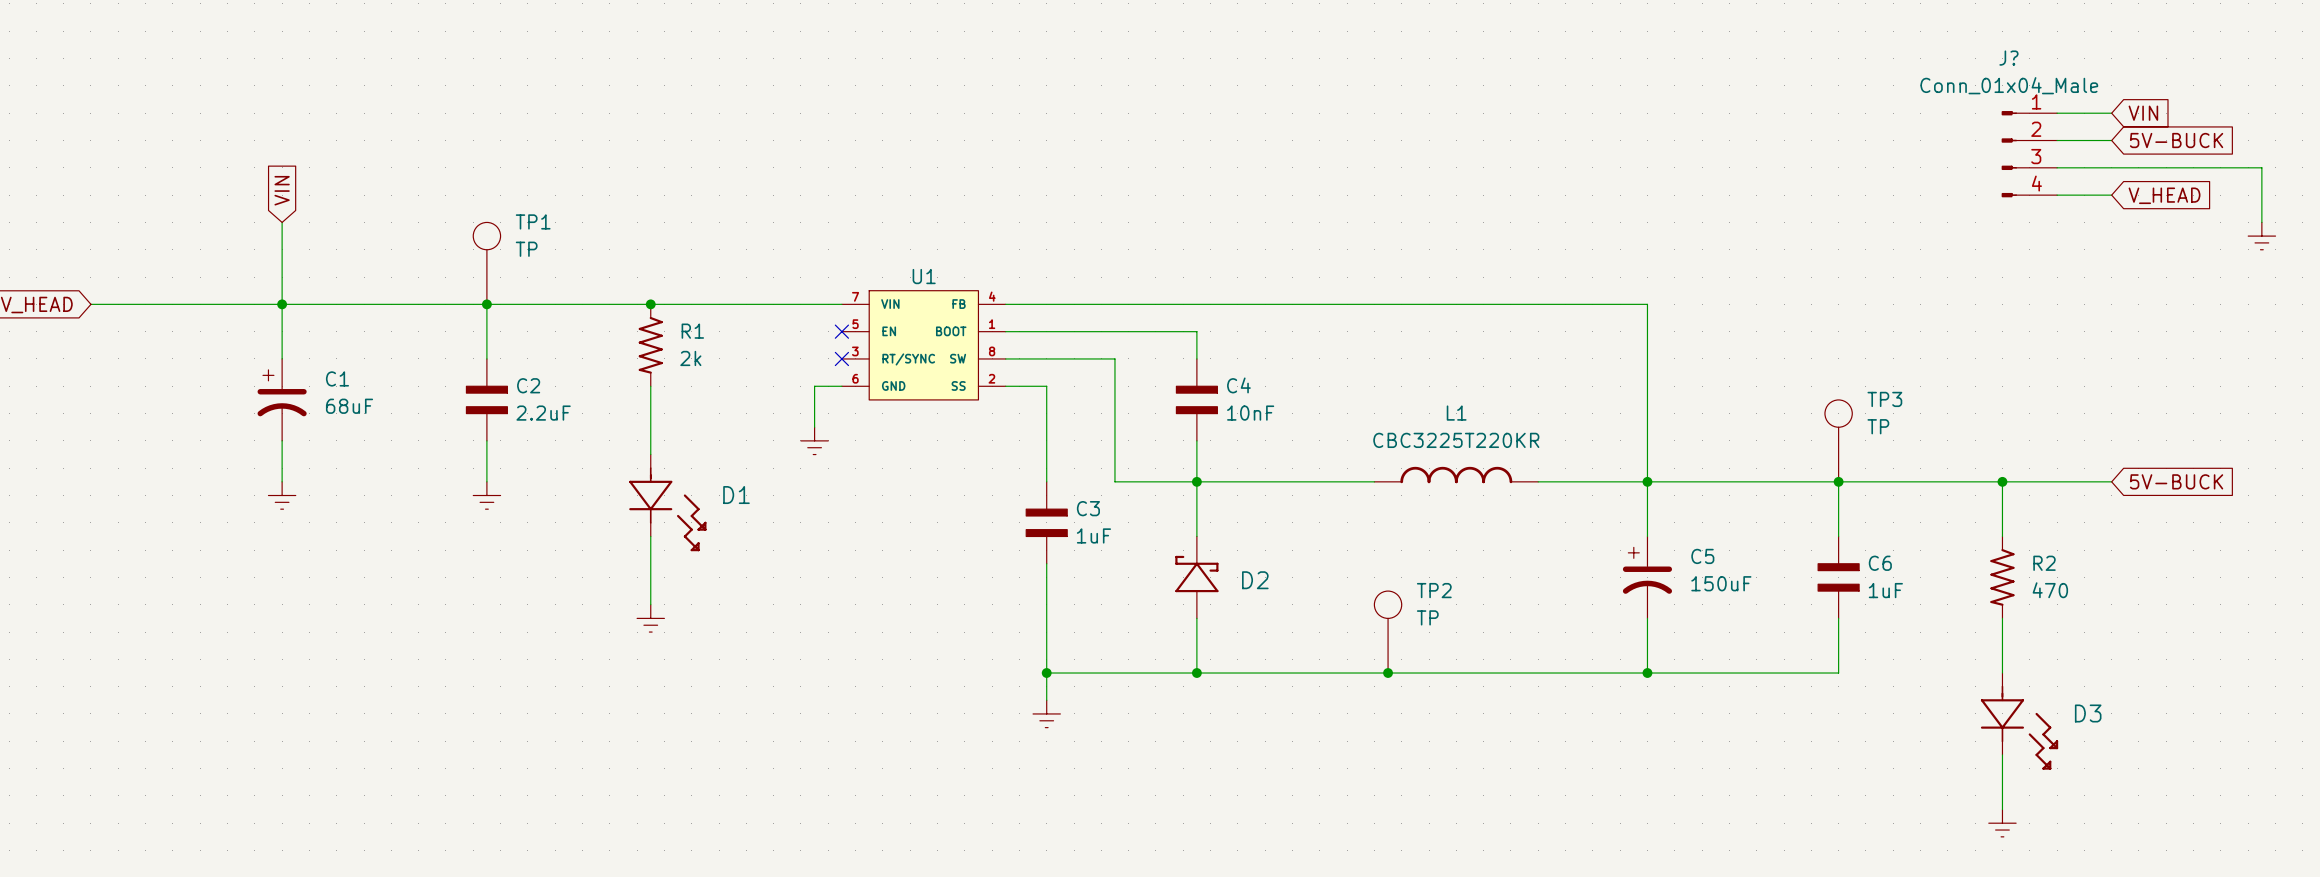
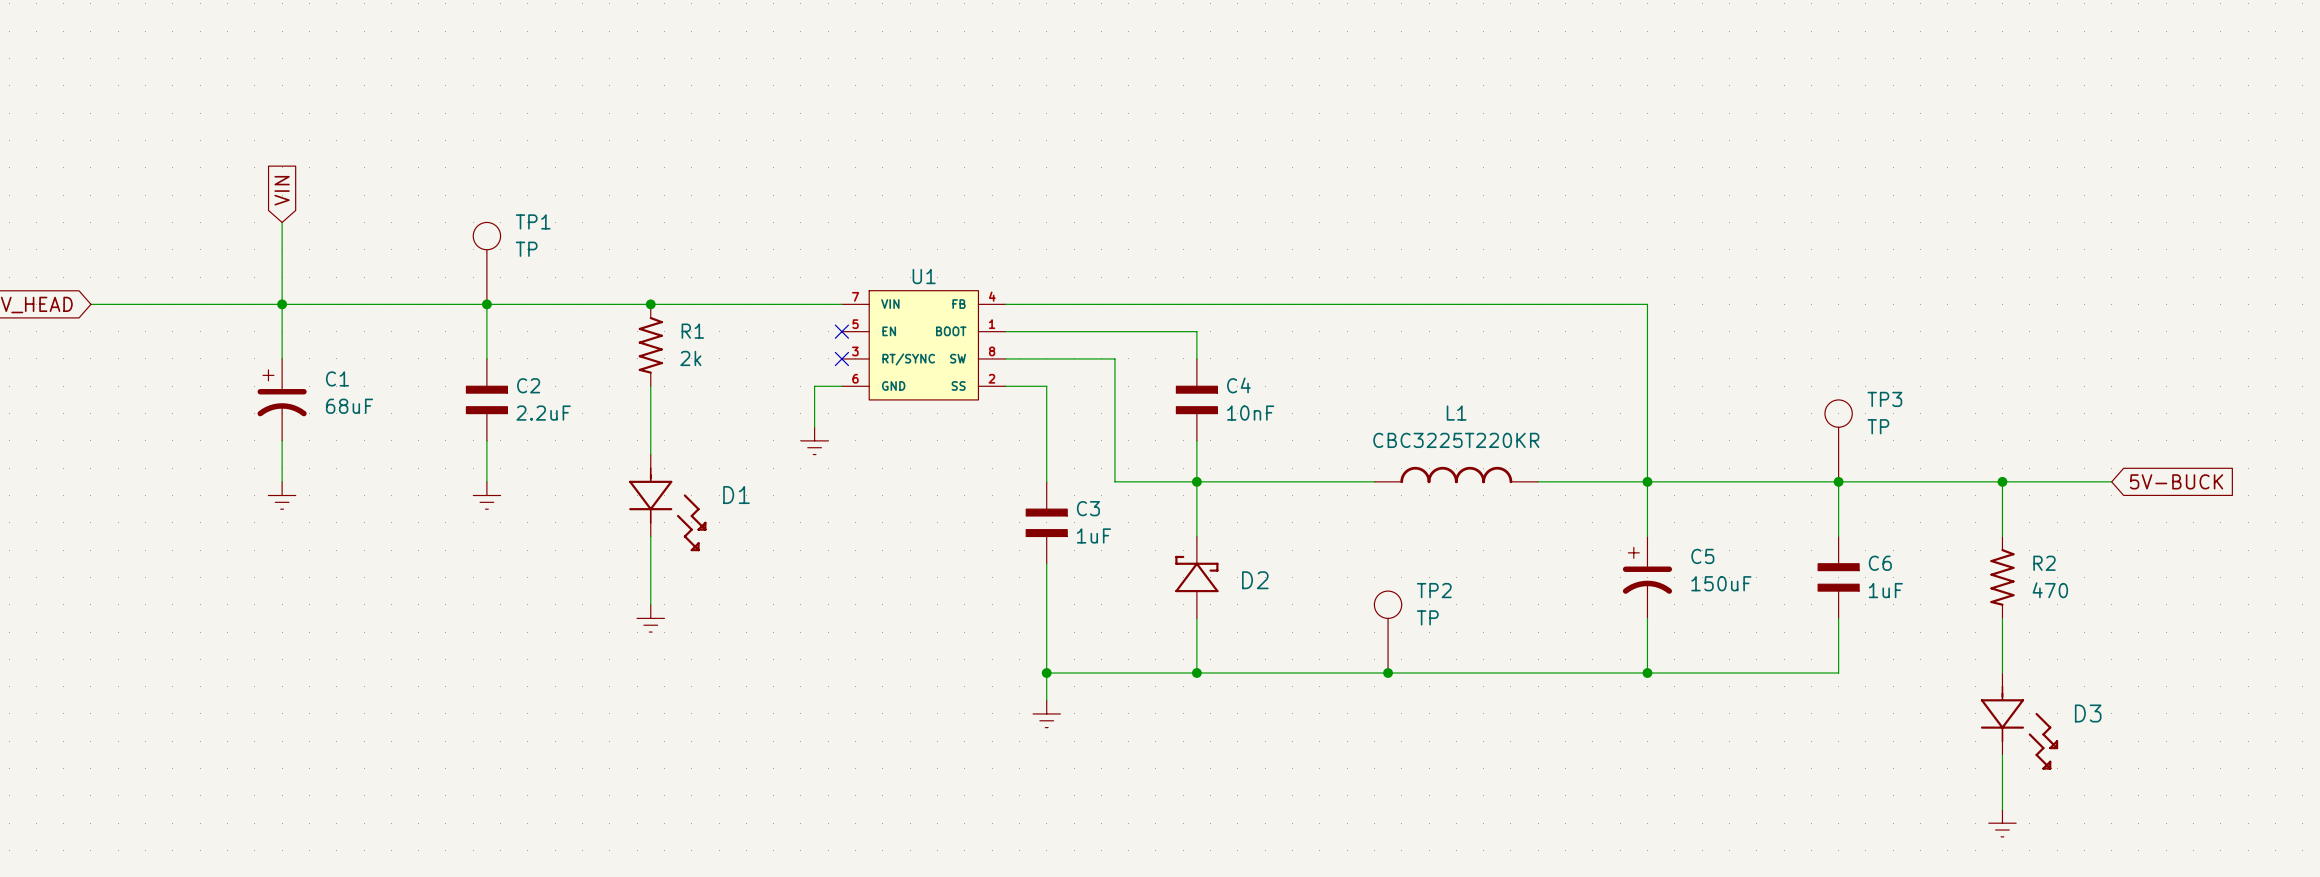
wire: (2057, 113) (2111, 113) -> none
global label: VIN (2143, 113) -> none
wire: (2057, 140) (2111, 140) -> none
global label: 5V-BUCK (2176, 140) -> none
J?: Conn_01x04_Male (2029, 154) -> none
wire: (2057, 167) (2261, 167) (2261, 222) -> none
wire: (2057, 195) (2111, 195) -> none
global label: V_HEAD (2164, 195) -> none
power symbol: (2261, 236) -> none

